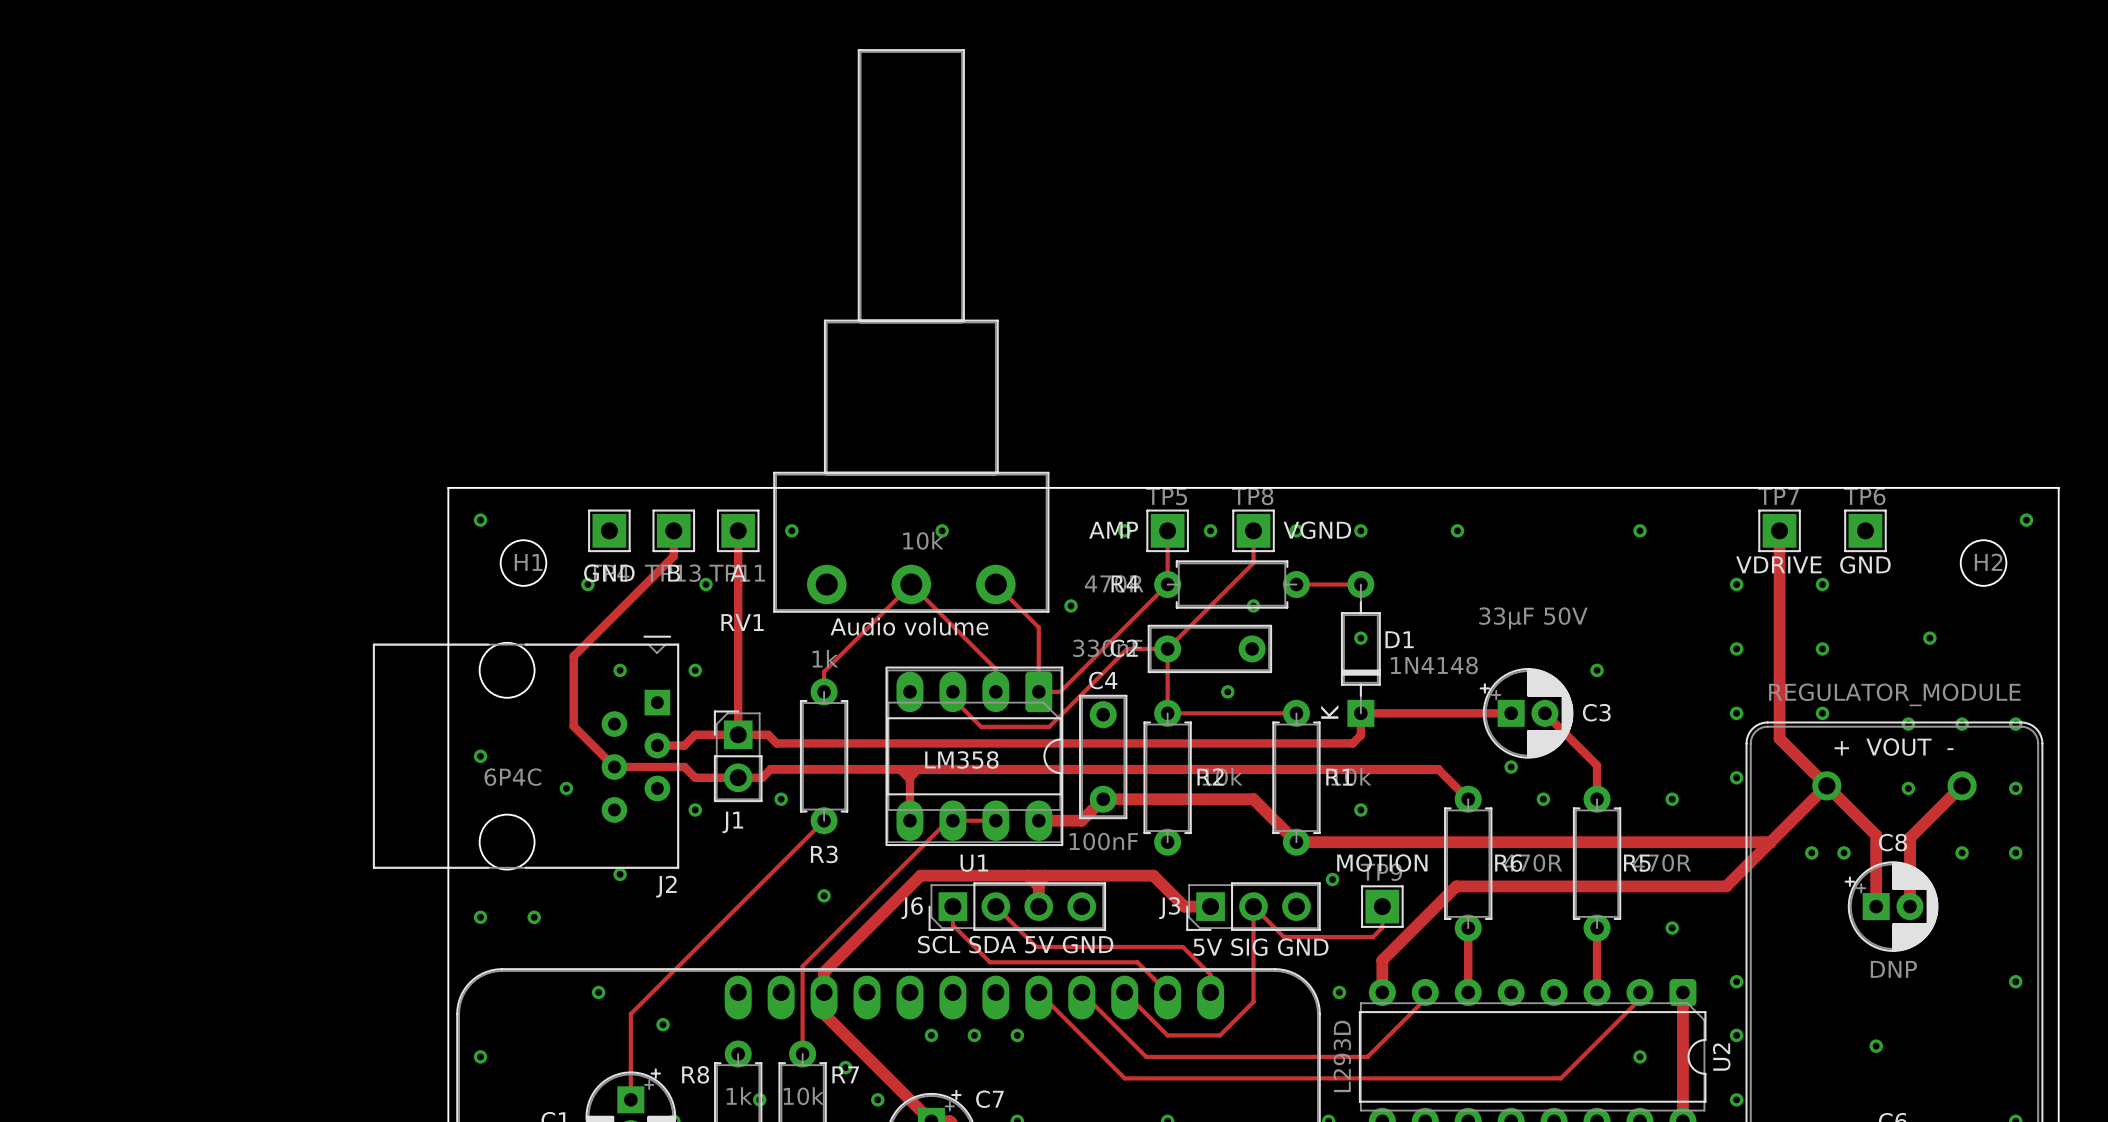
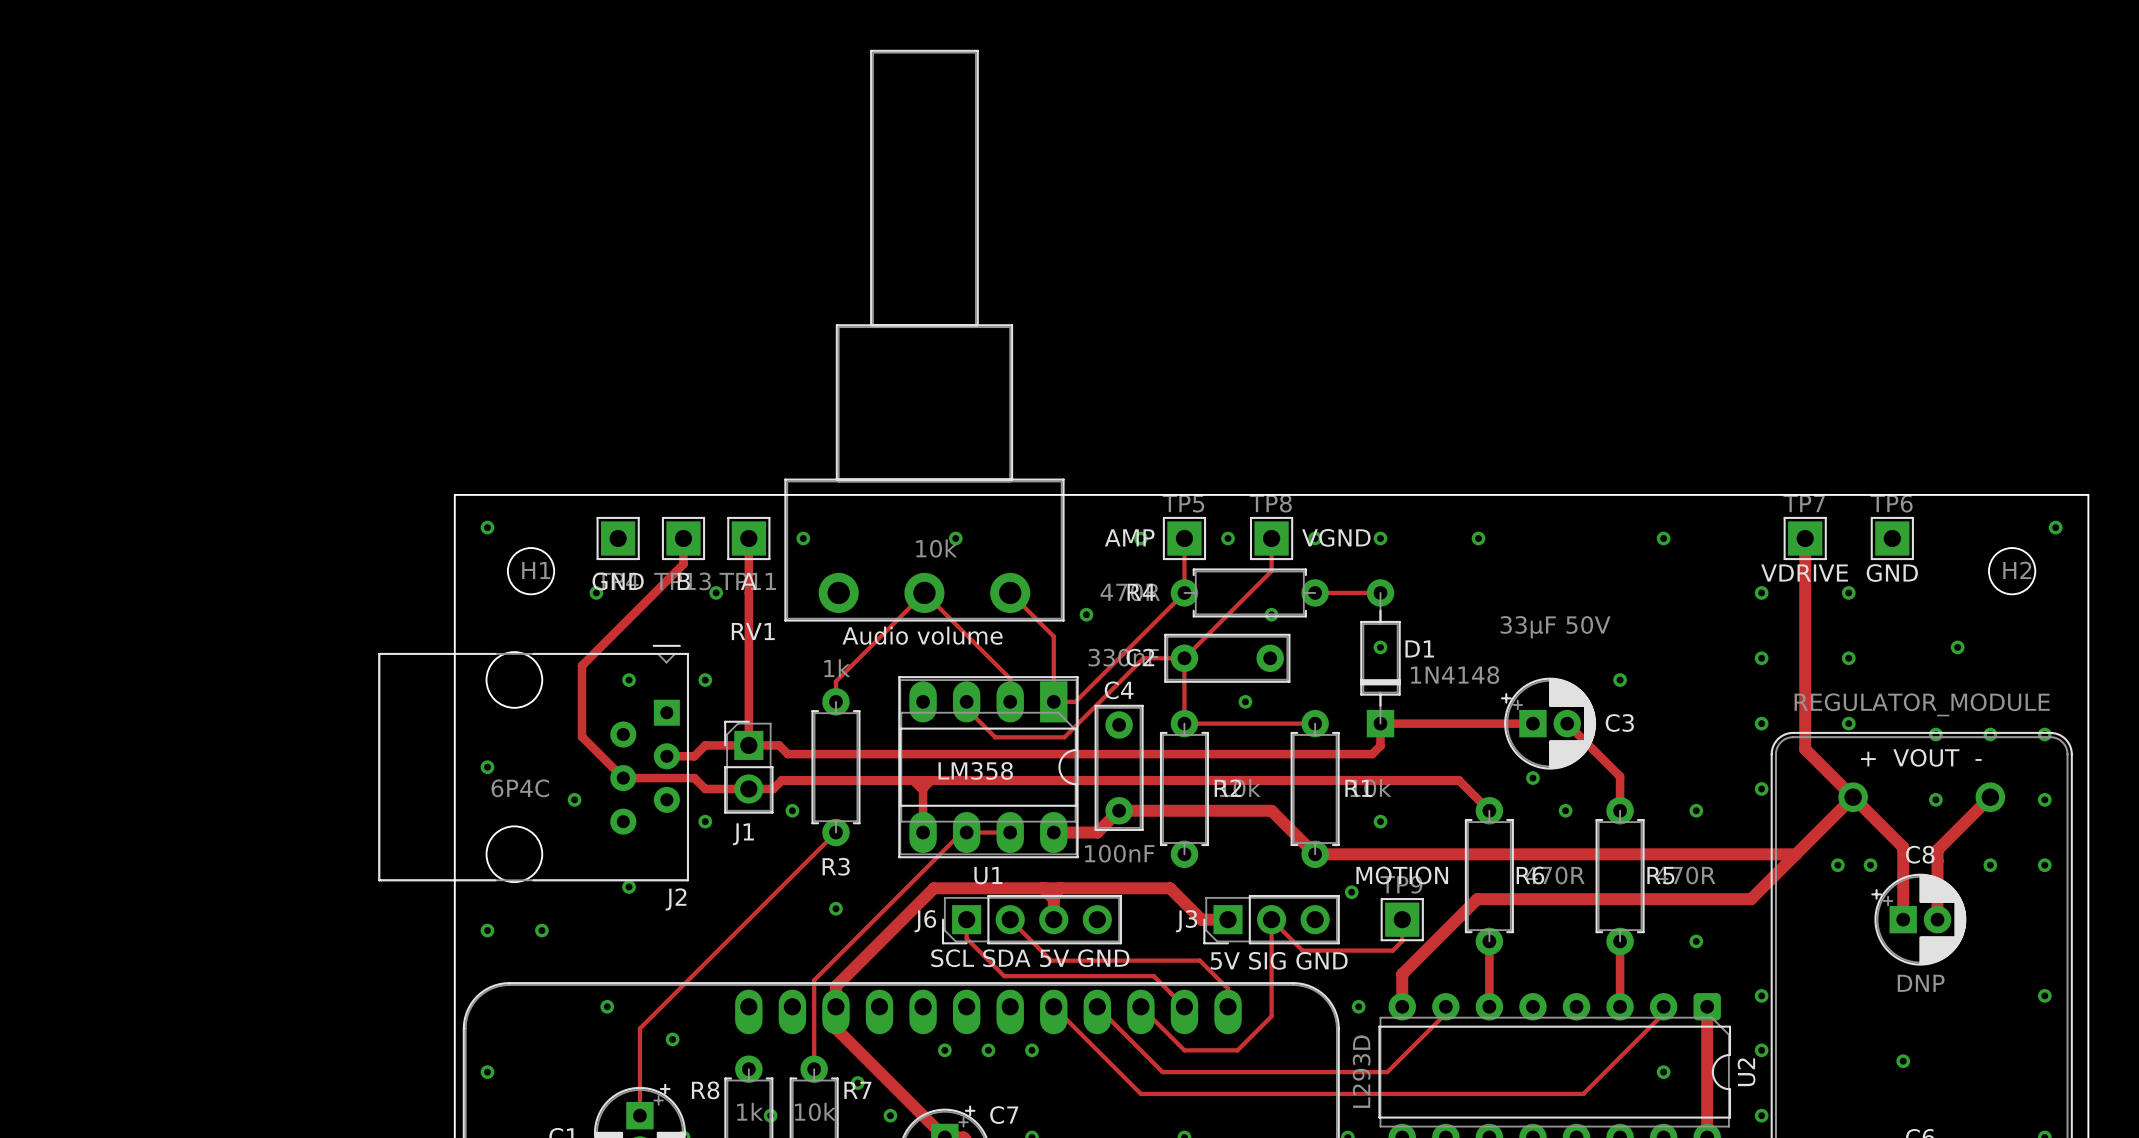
D1 footprint: [1340, 571, 1381, 727] -> [1360, 579, 1401, 738]
U1 footprint: [885, 666, 1064, 847] -> [898, 676, 1079, 859]

